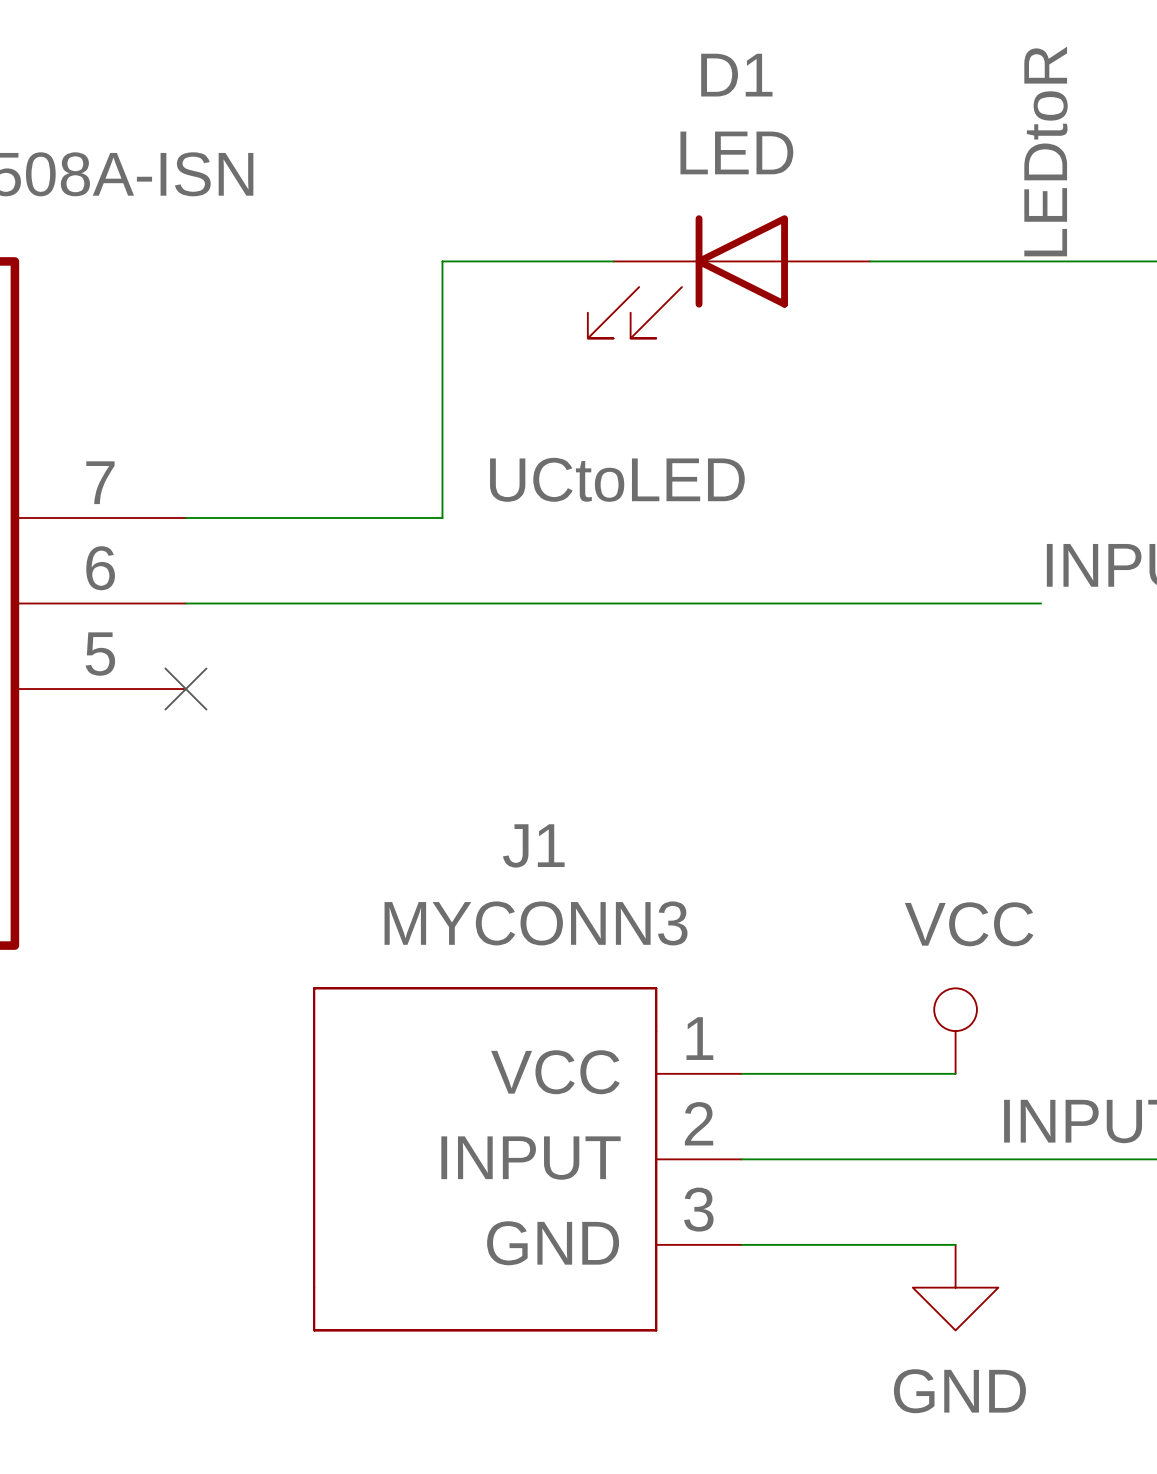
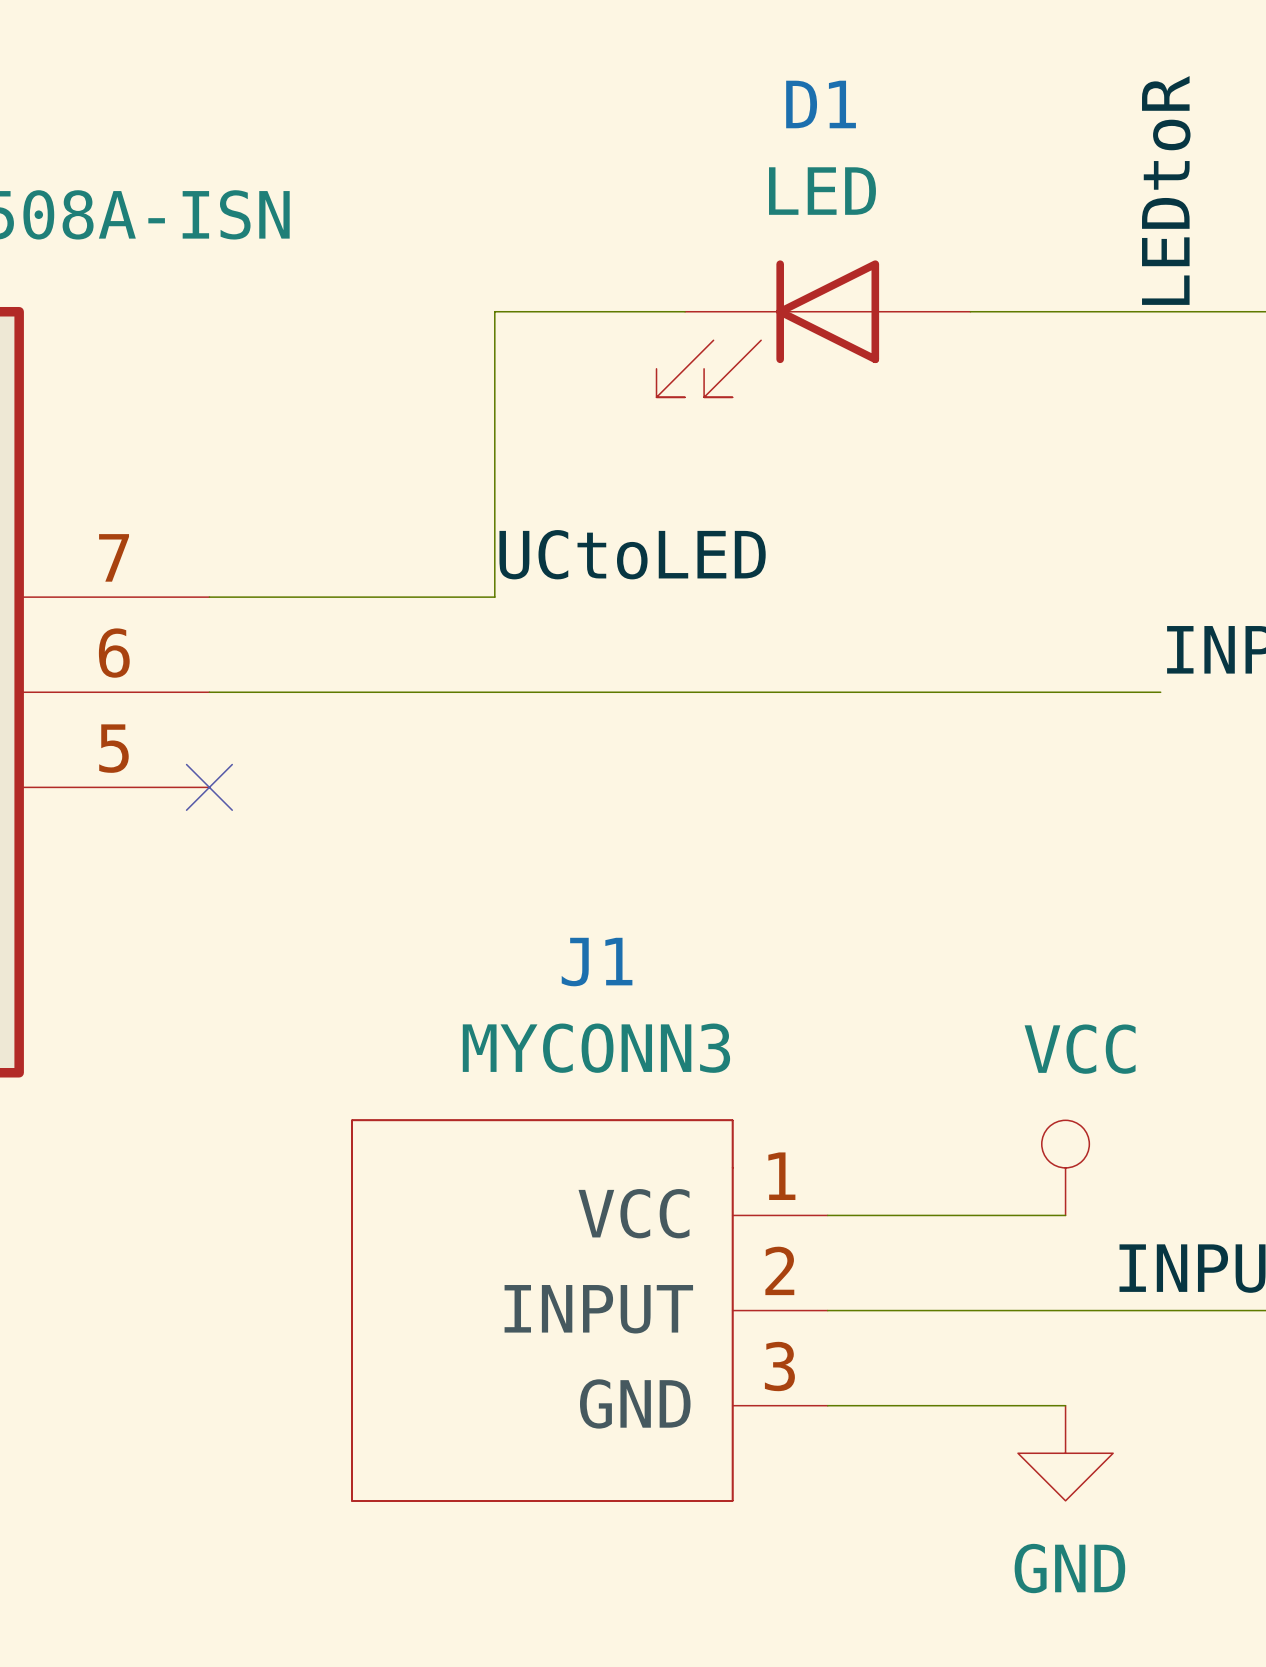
label position: UCtoLED (617, 479) -> UCtoLED (632, 554)

